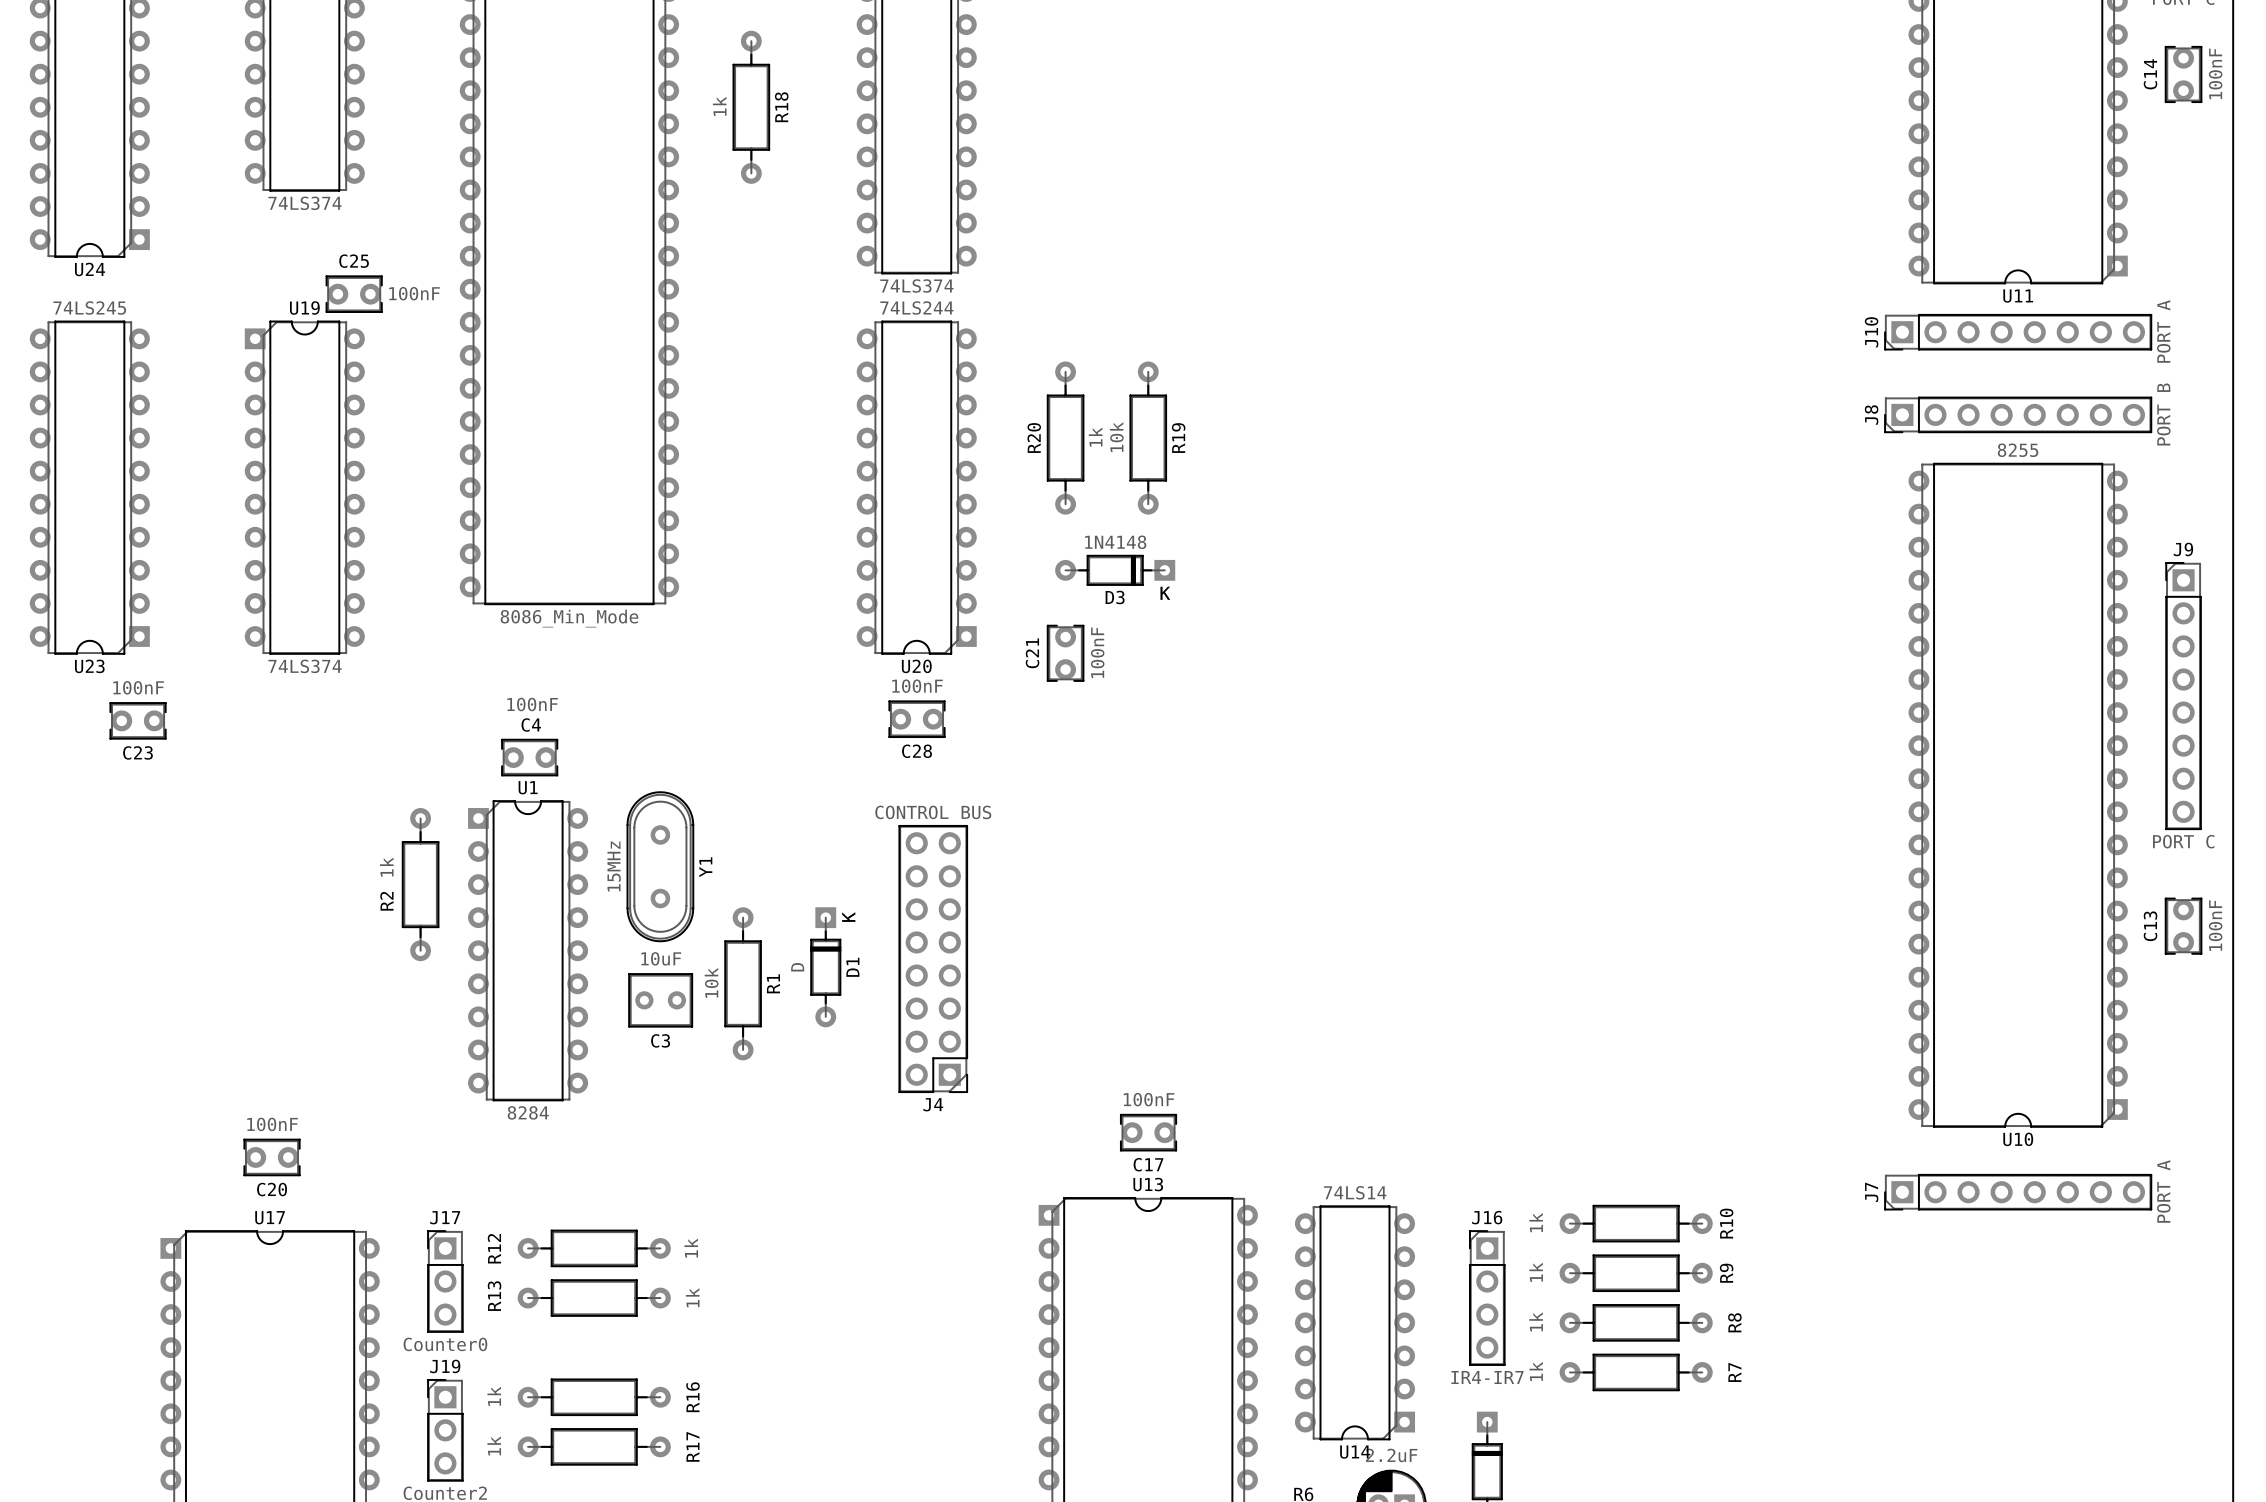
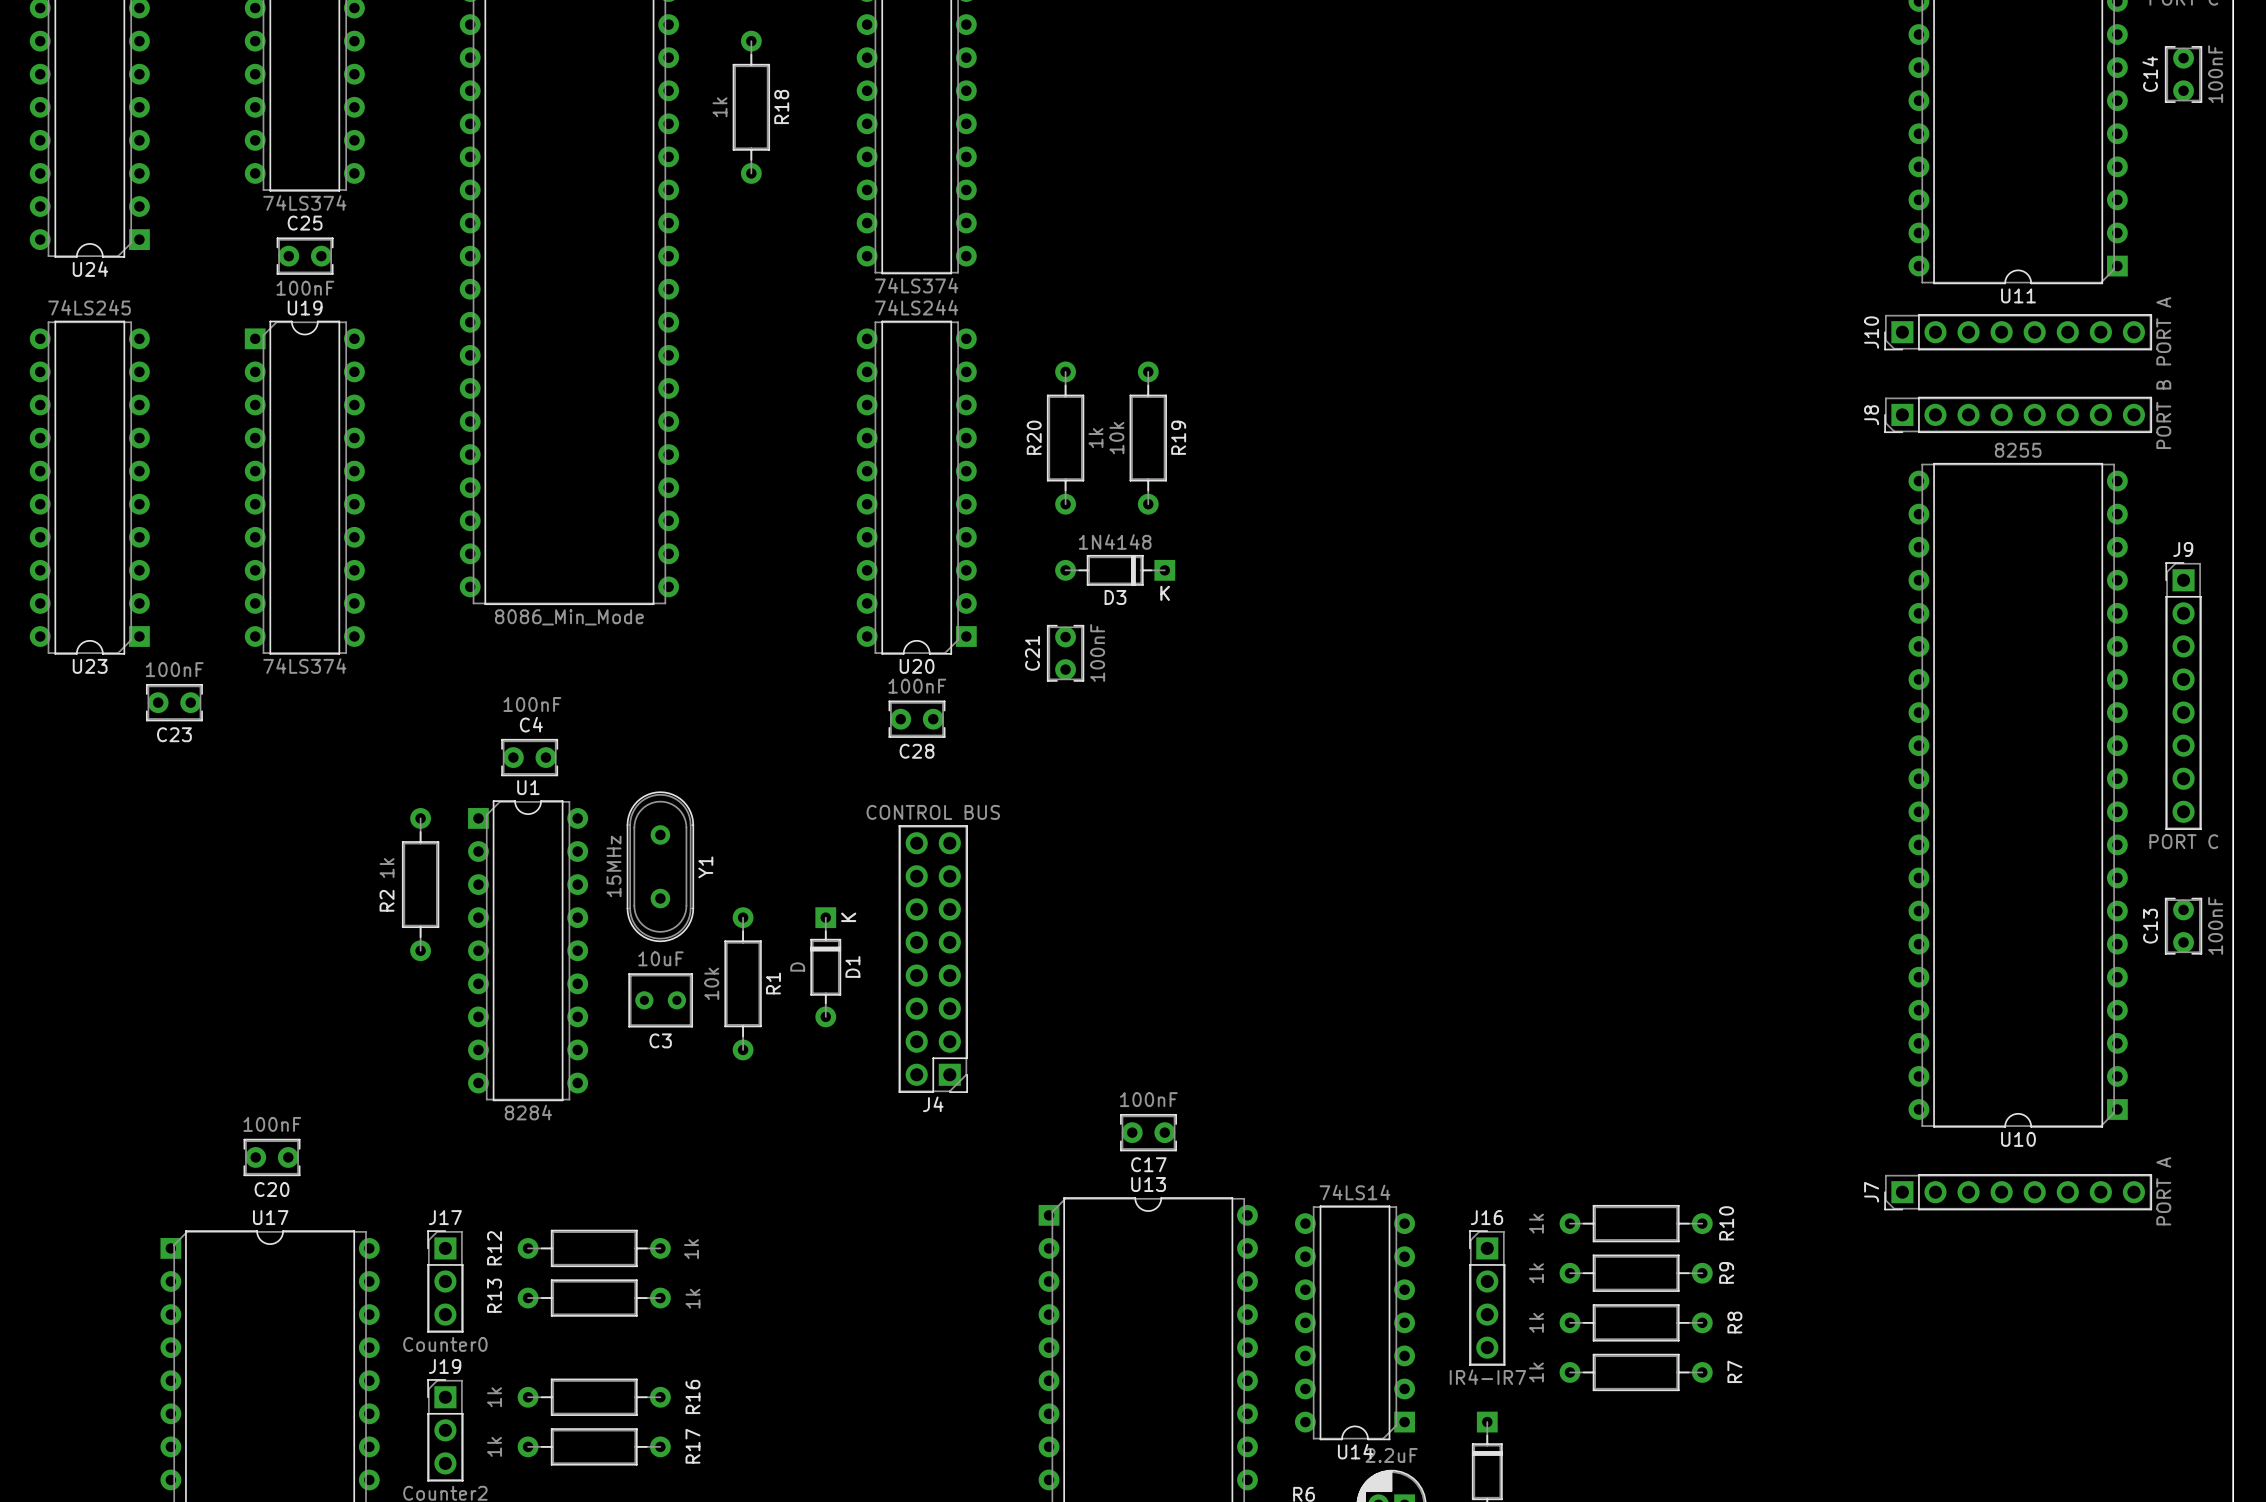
C25 value position: 100nF (414, 293) -> 100nF (305, 288)
C25 position: (354, 294) -> (305, 256)
C23 position: (138, 720) -> (174, 702)

